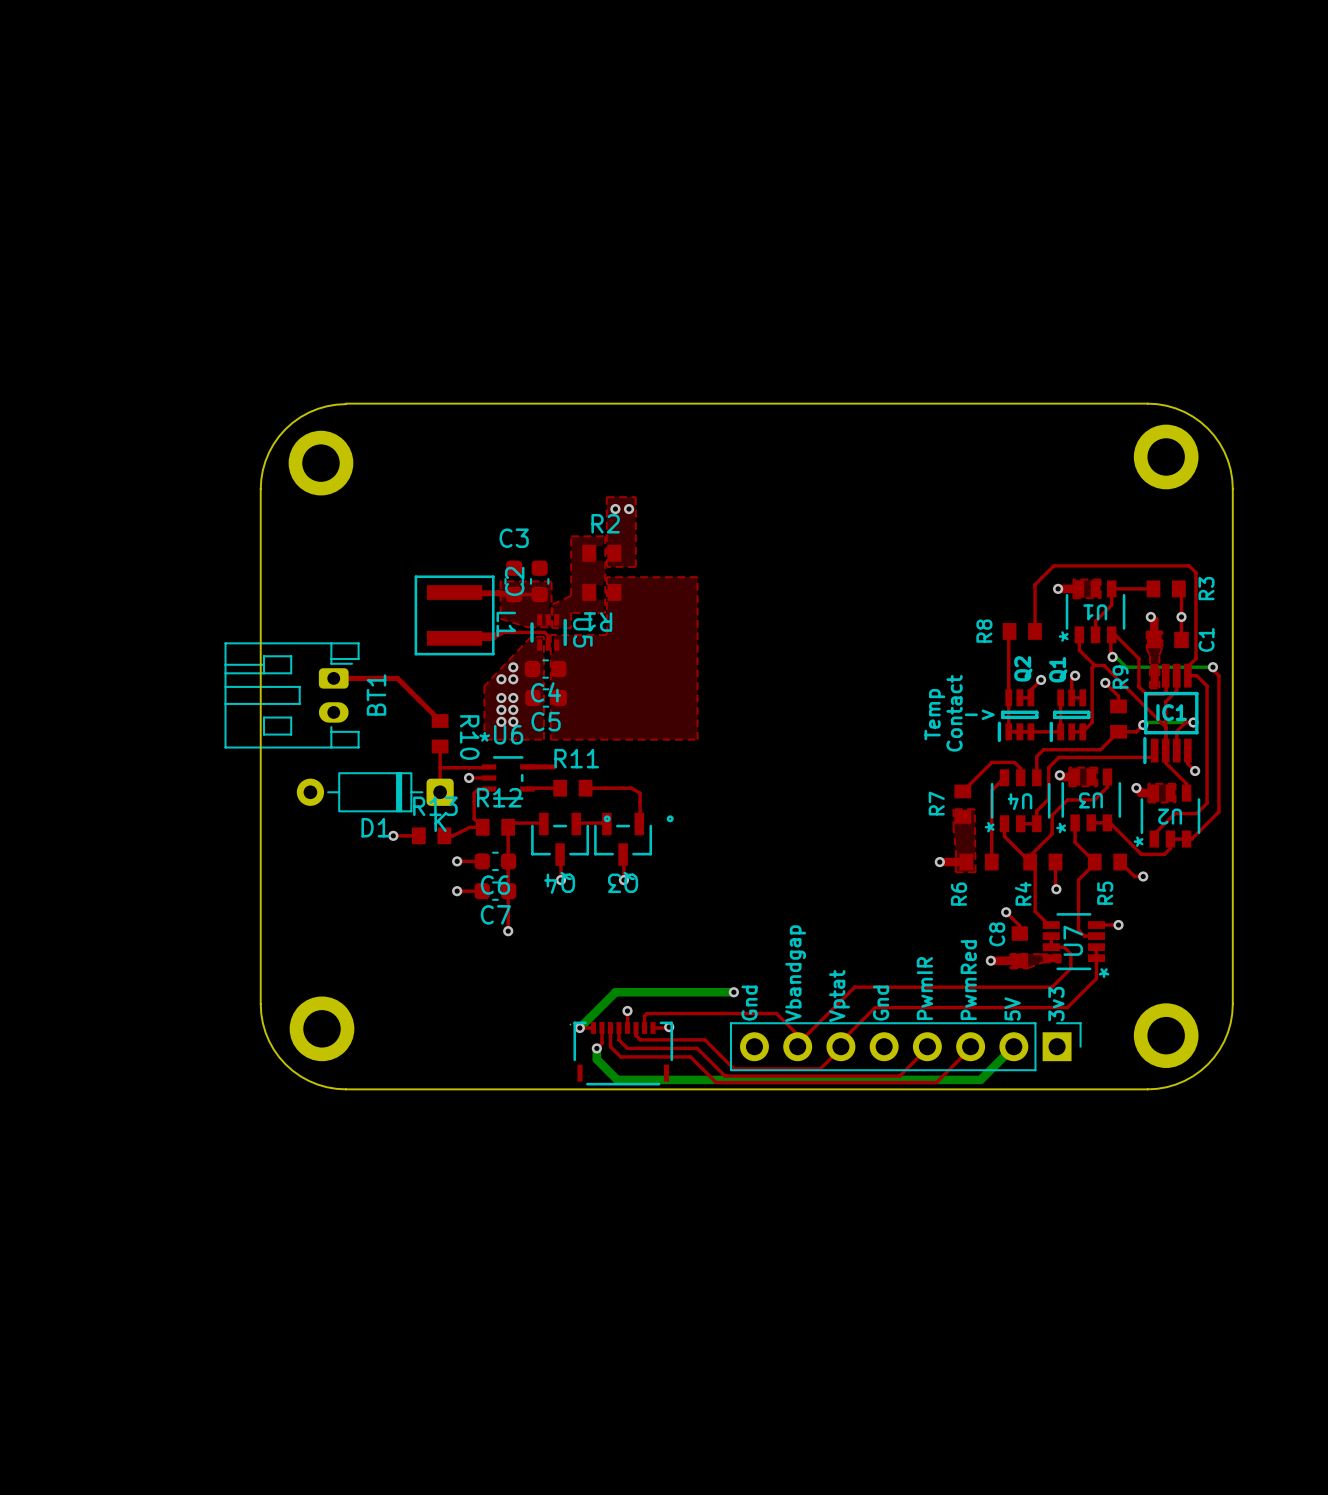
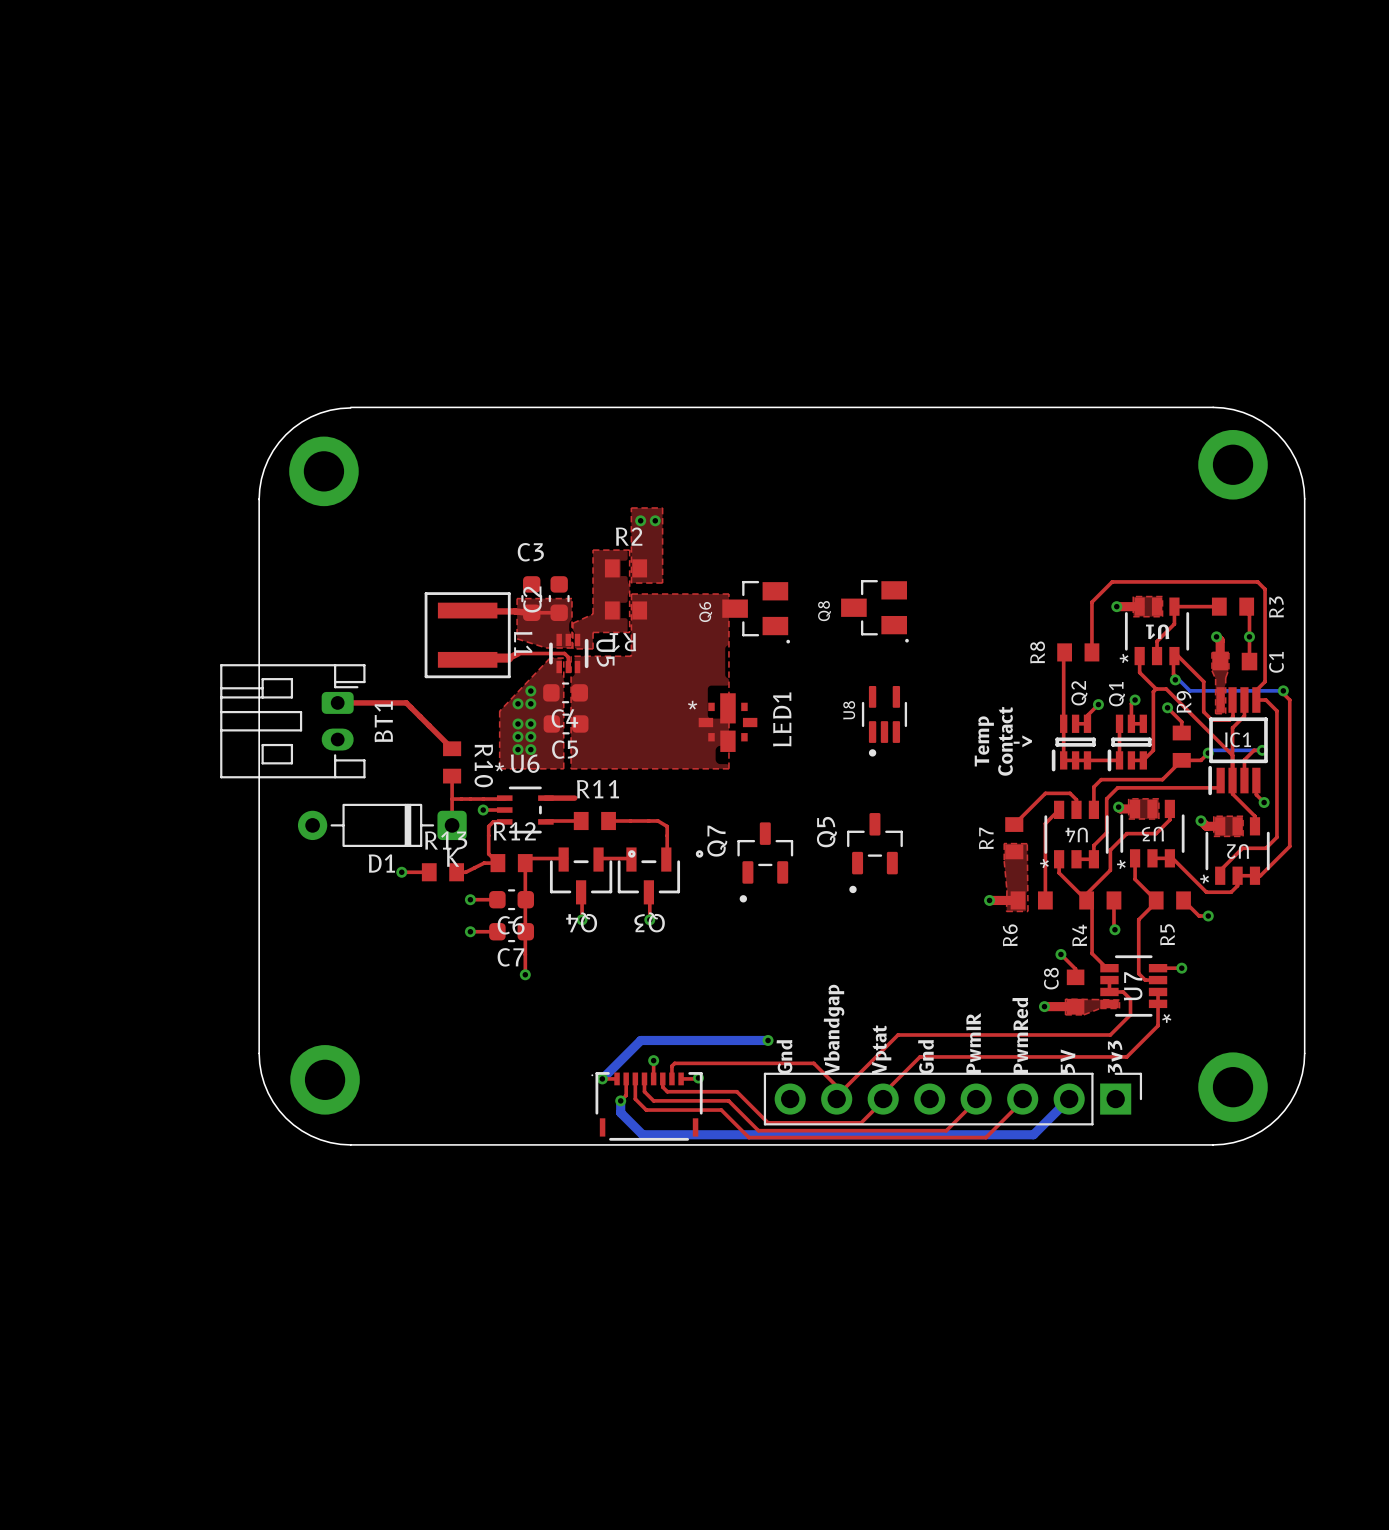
Q8: none -> (874, 611)
Q6: none -> (756, 612)
U8: none -> (884, 721)
LED1: none -> (728, 722)
Q5: none -> (874, 853)
Q7: none -> (765, 862)

